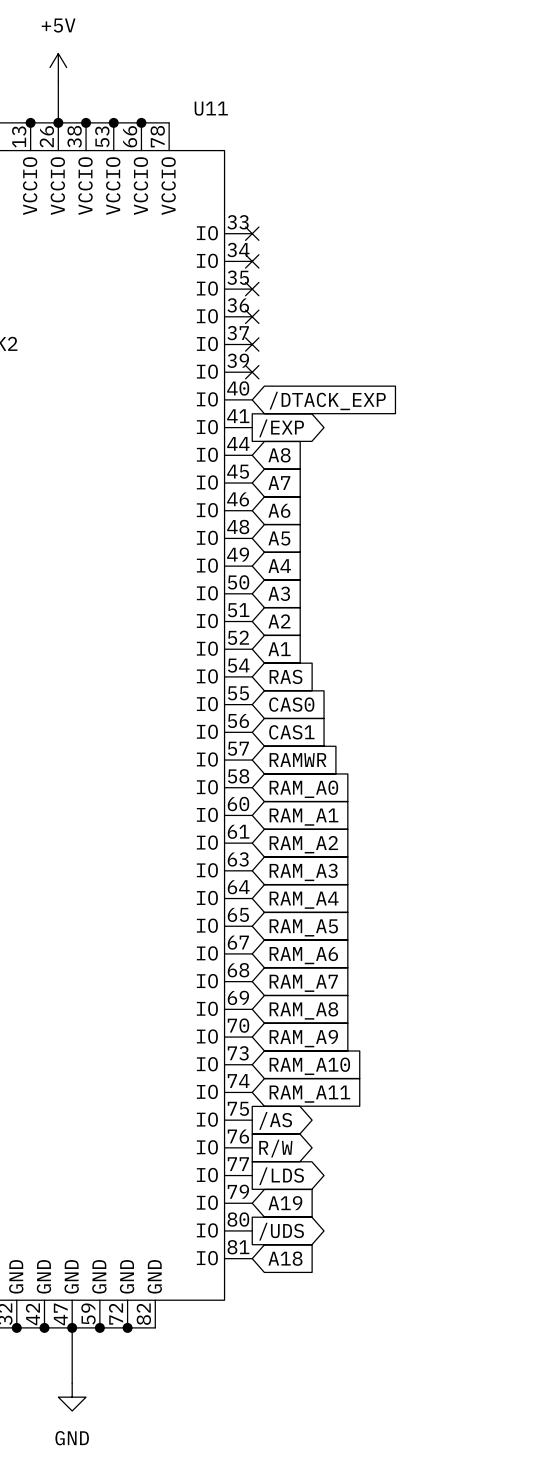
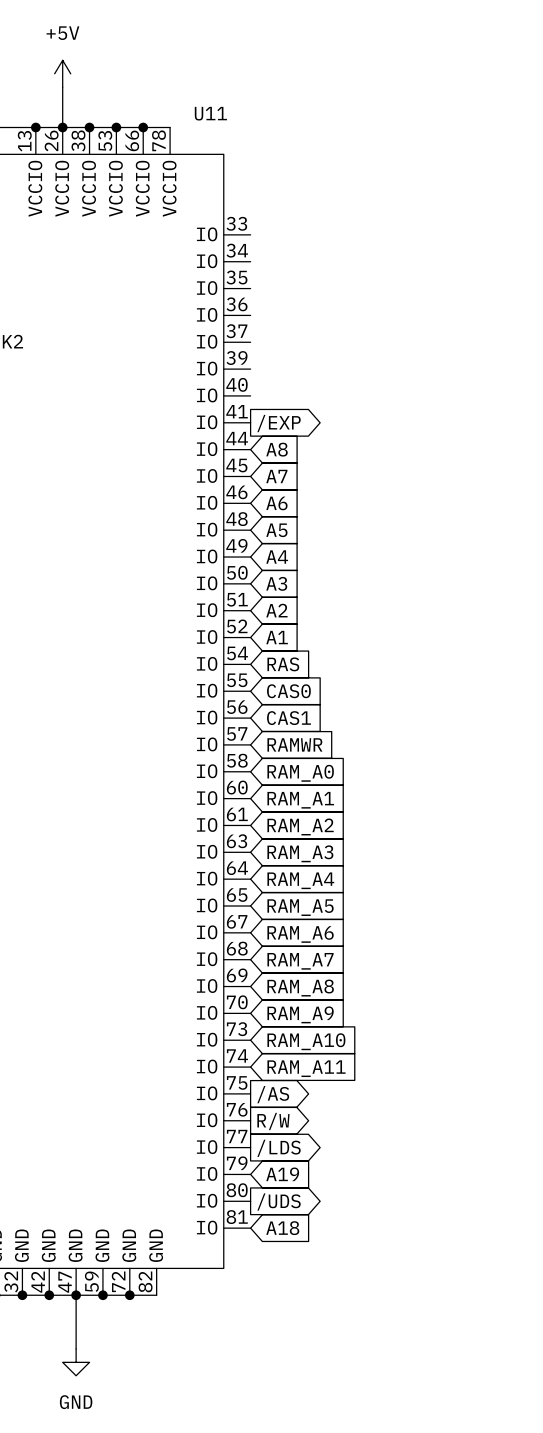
no-connect mark: (252, 233) -> none
no-connect mark: (252, 261) -> none
no-connect mark: (252, 289) -> none
no-connect mark: (252, 316) -> none
no-connect mark: (252, 344) -> none
no-connect mark: (252, 372) -> none
global label: /DTACK_EXP (327, 400) -> none

